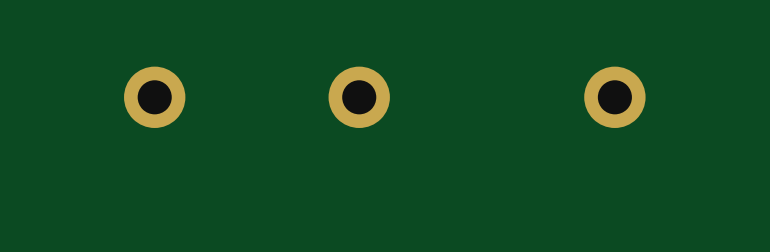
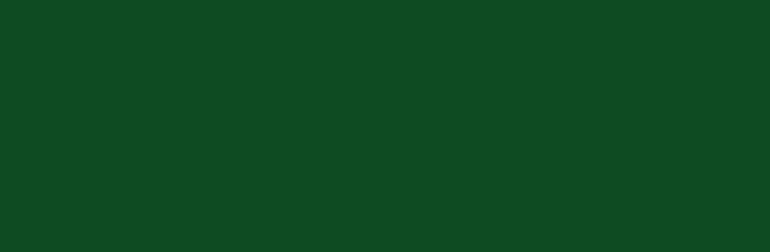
via: (154, 97) -> none
via: (359, 97) -> none
via: (614, 97) -> none

